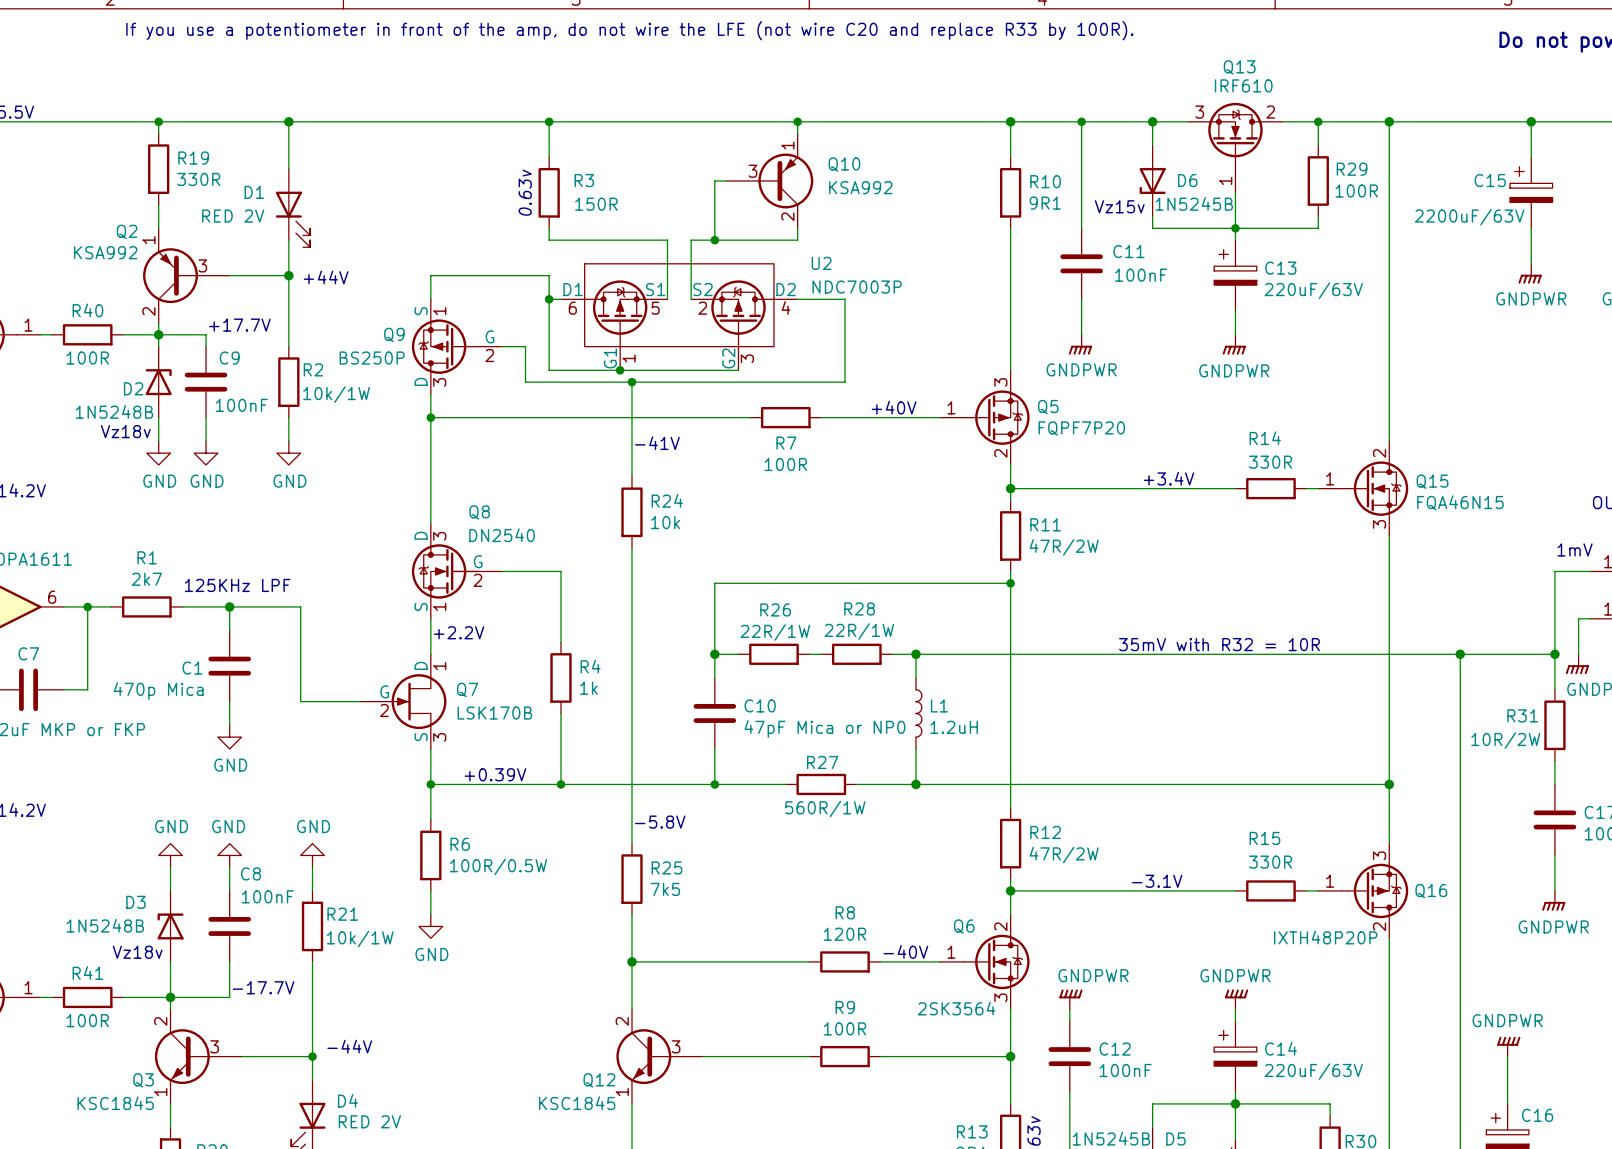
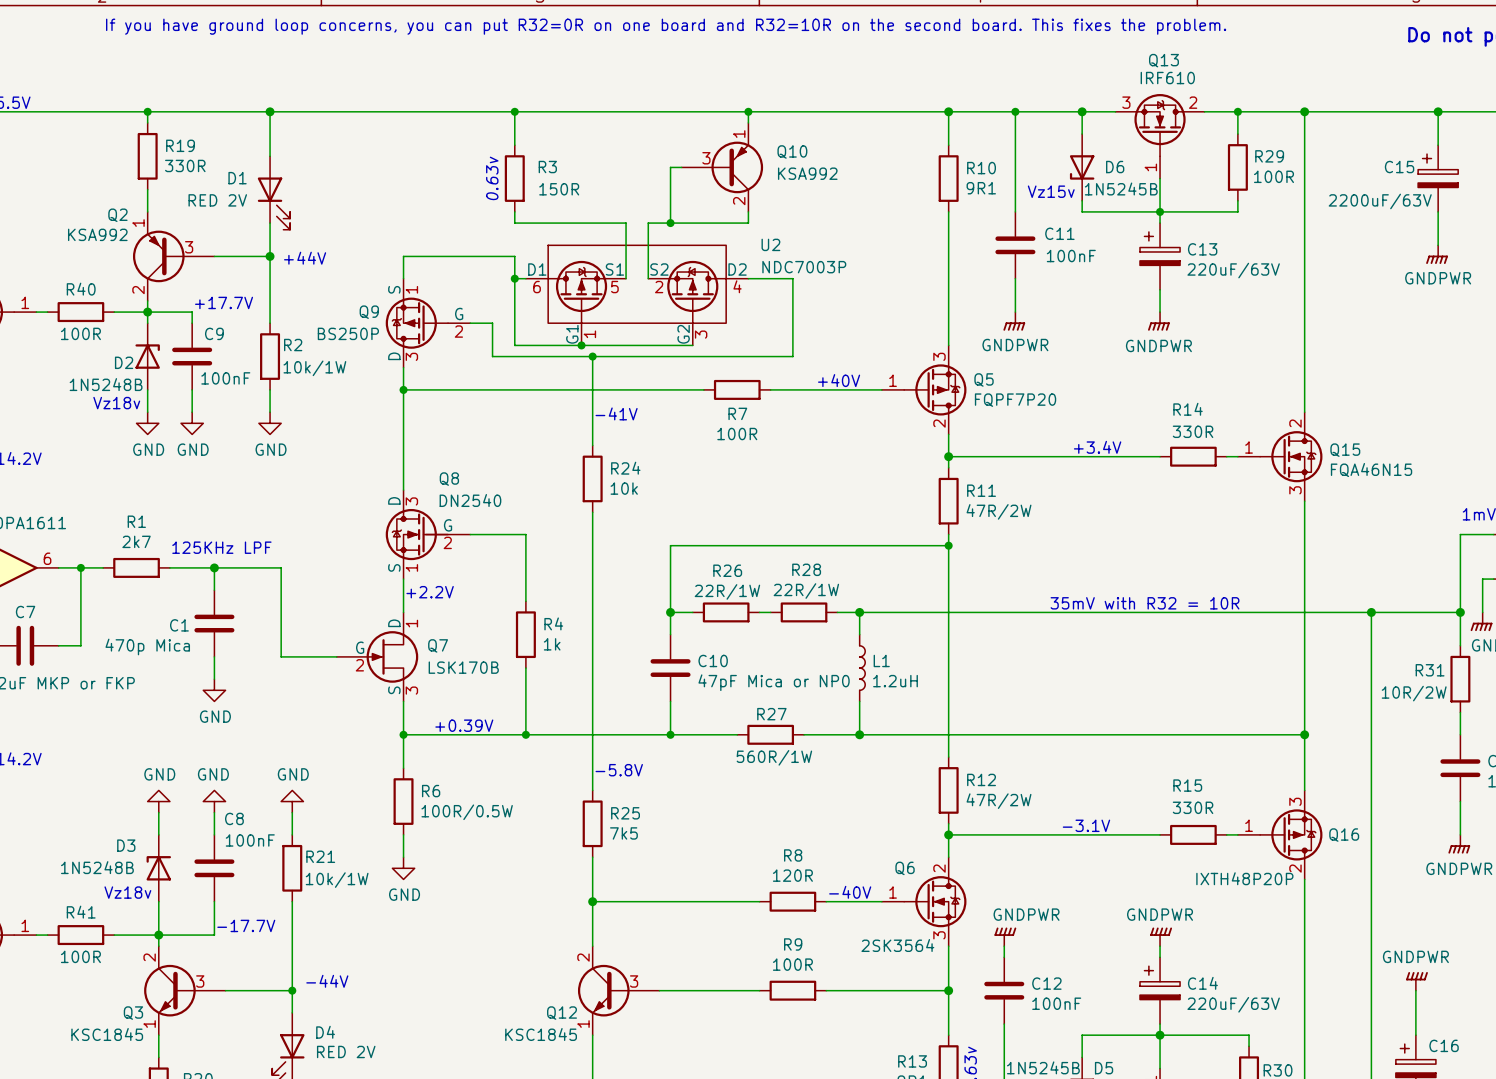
text: If you use a potentiometer in front of the amp, do not wire the LFE (not wire C20 and replace R33 by 100R). (629, 30) -> none
text: none -> If you have ground loop concerns, you can put R32=0R on one board and R32=10R on the second board. This fixes the problem. (666, 26)

